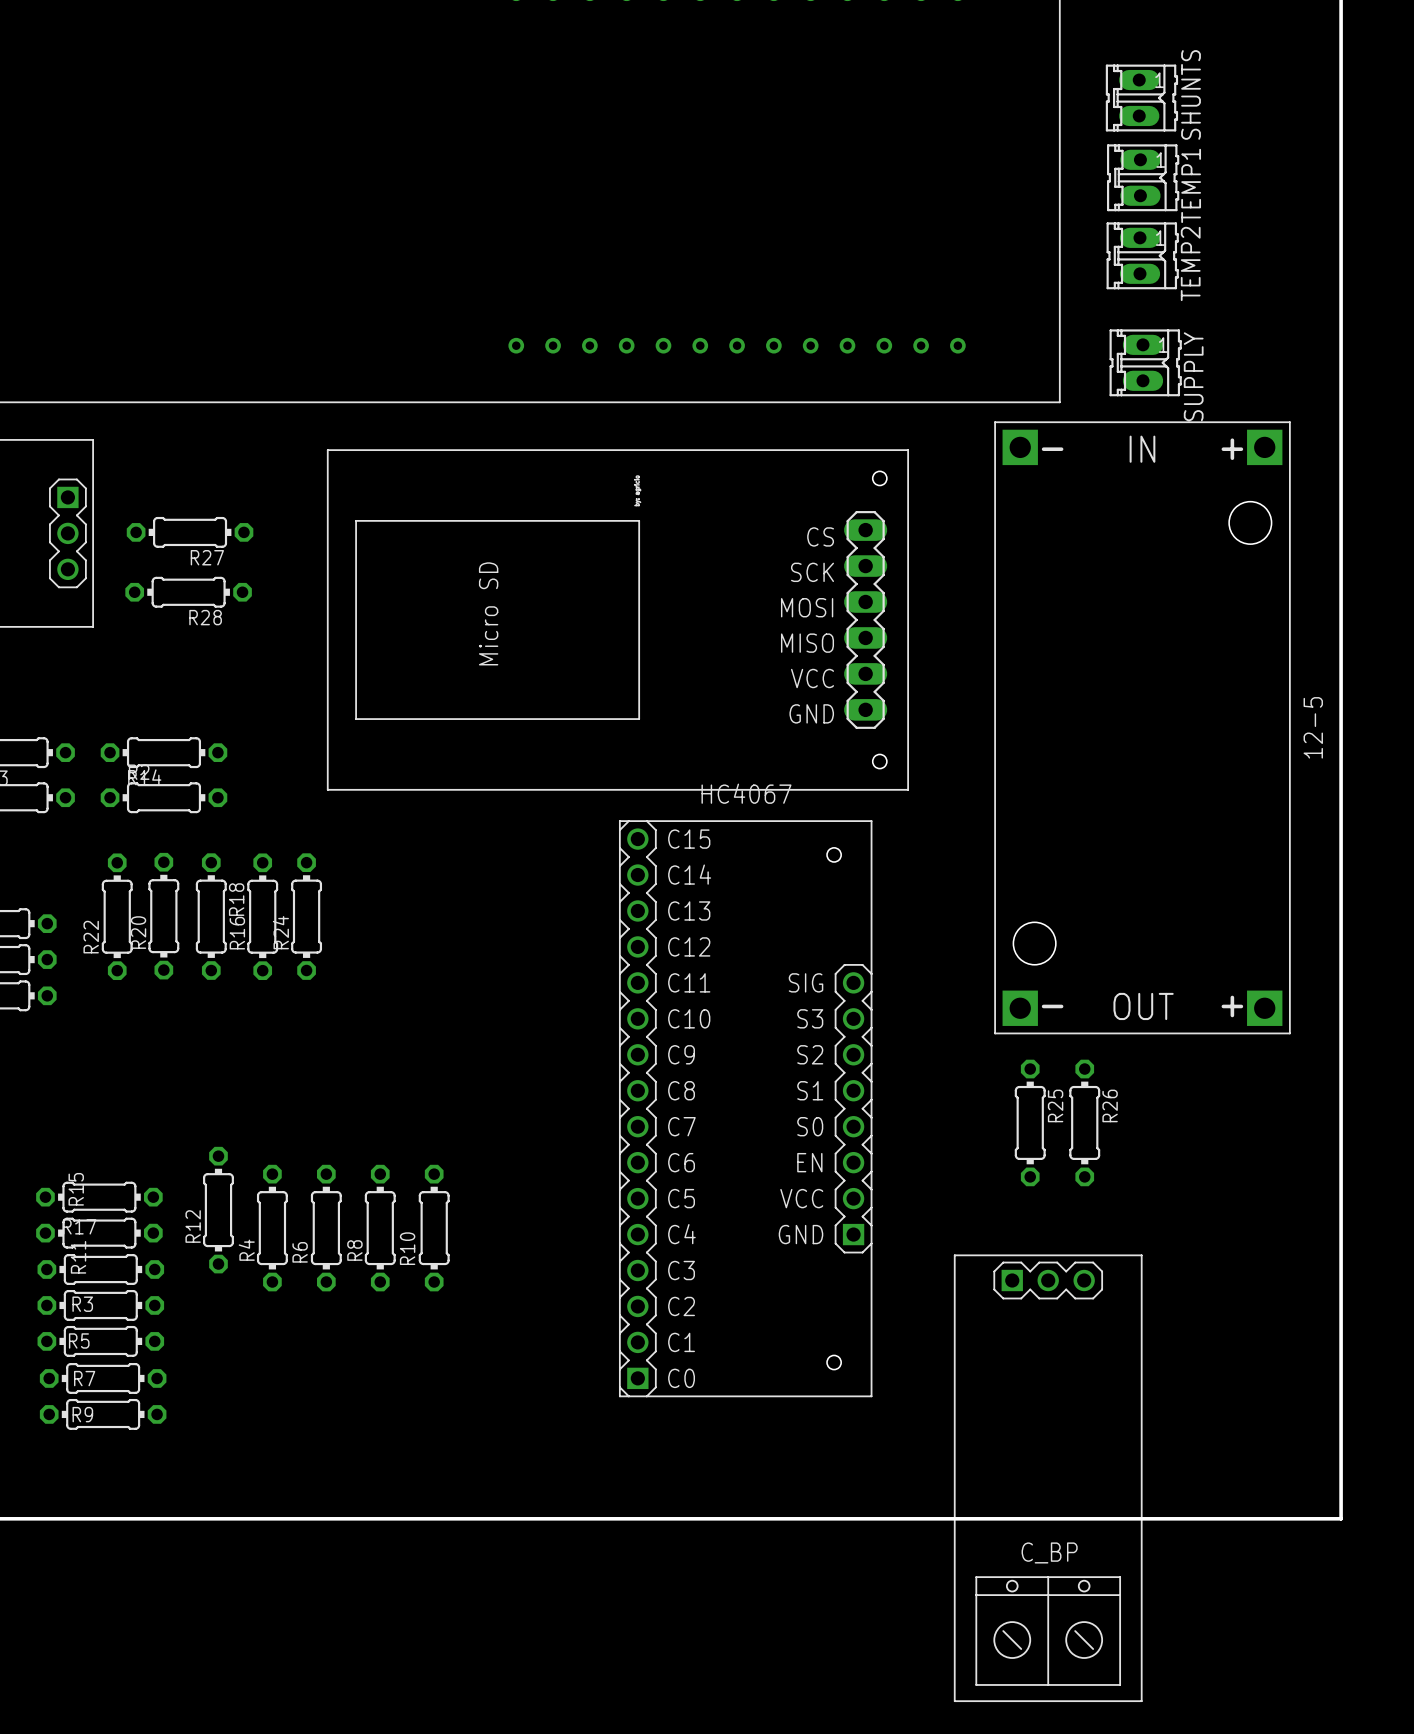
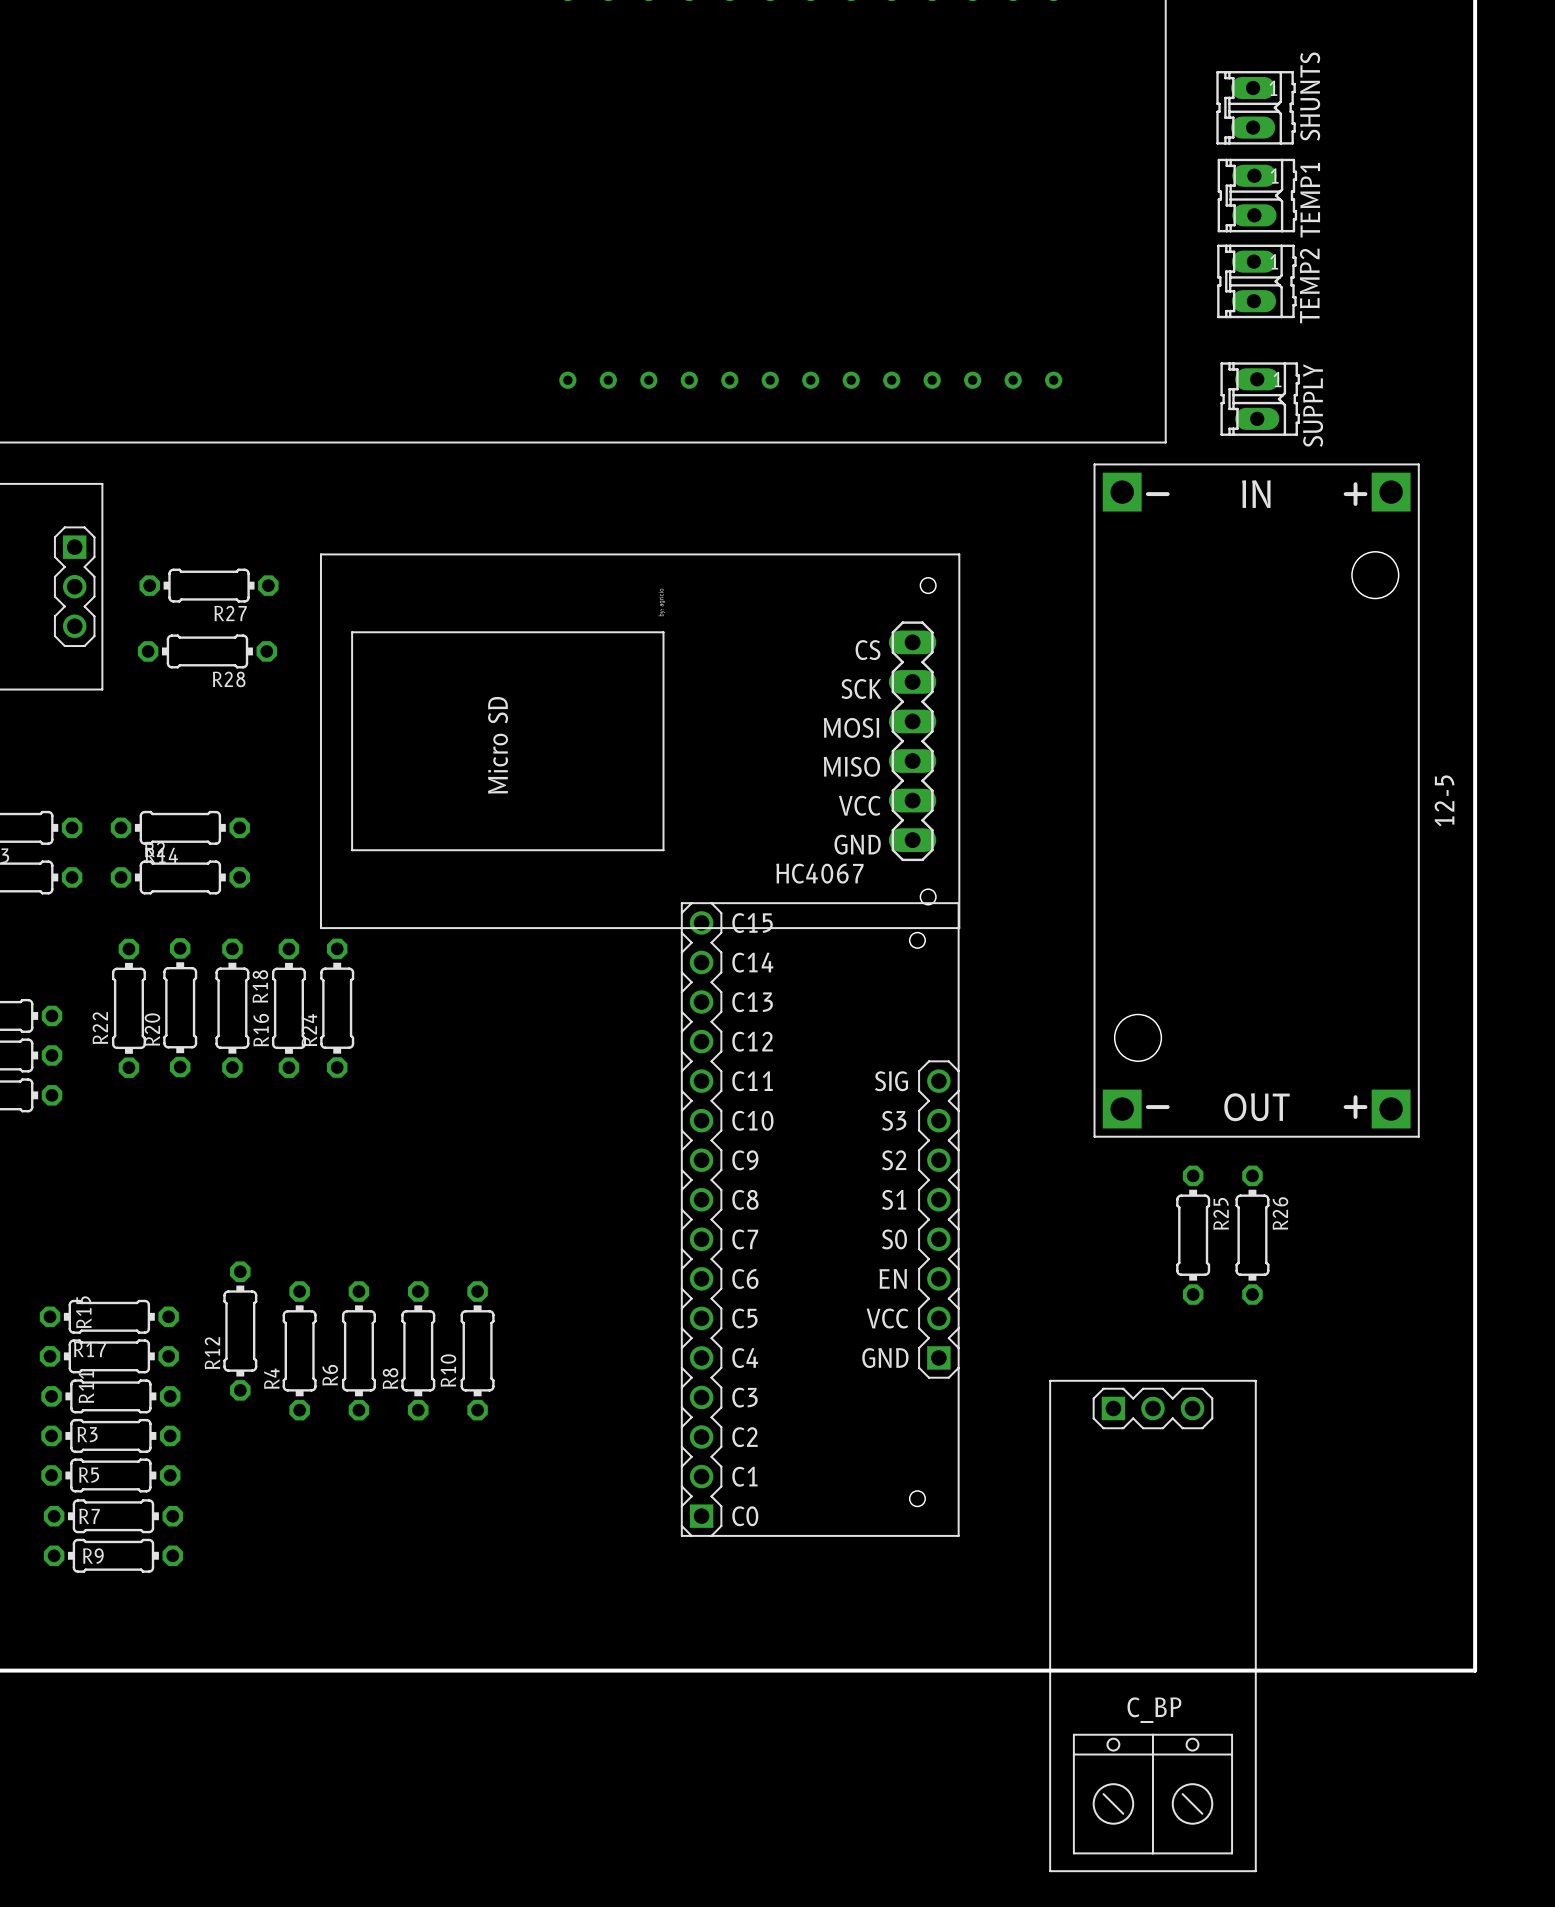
part position: (617, 619) -> (640, 741)
R26 name: R26 (1110, 1105) -> R25 (1221, 1213)
R25: (1030, 1122) -> none
R26: none -> (1252, 1235)

